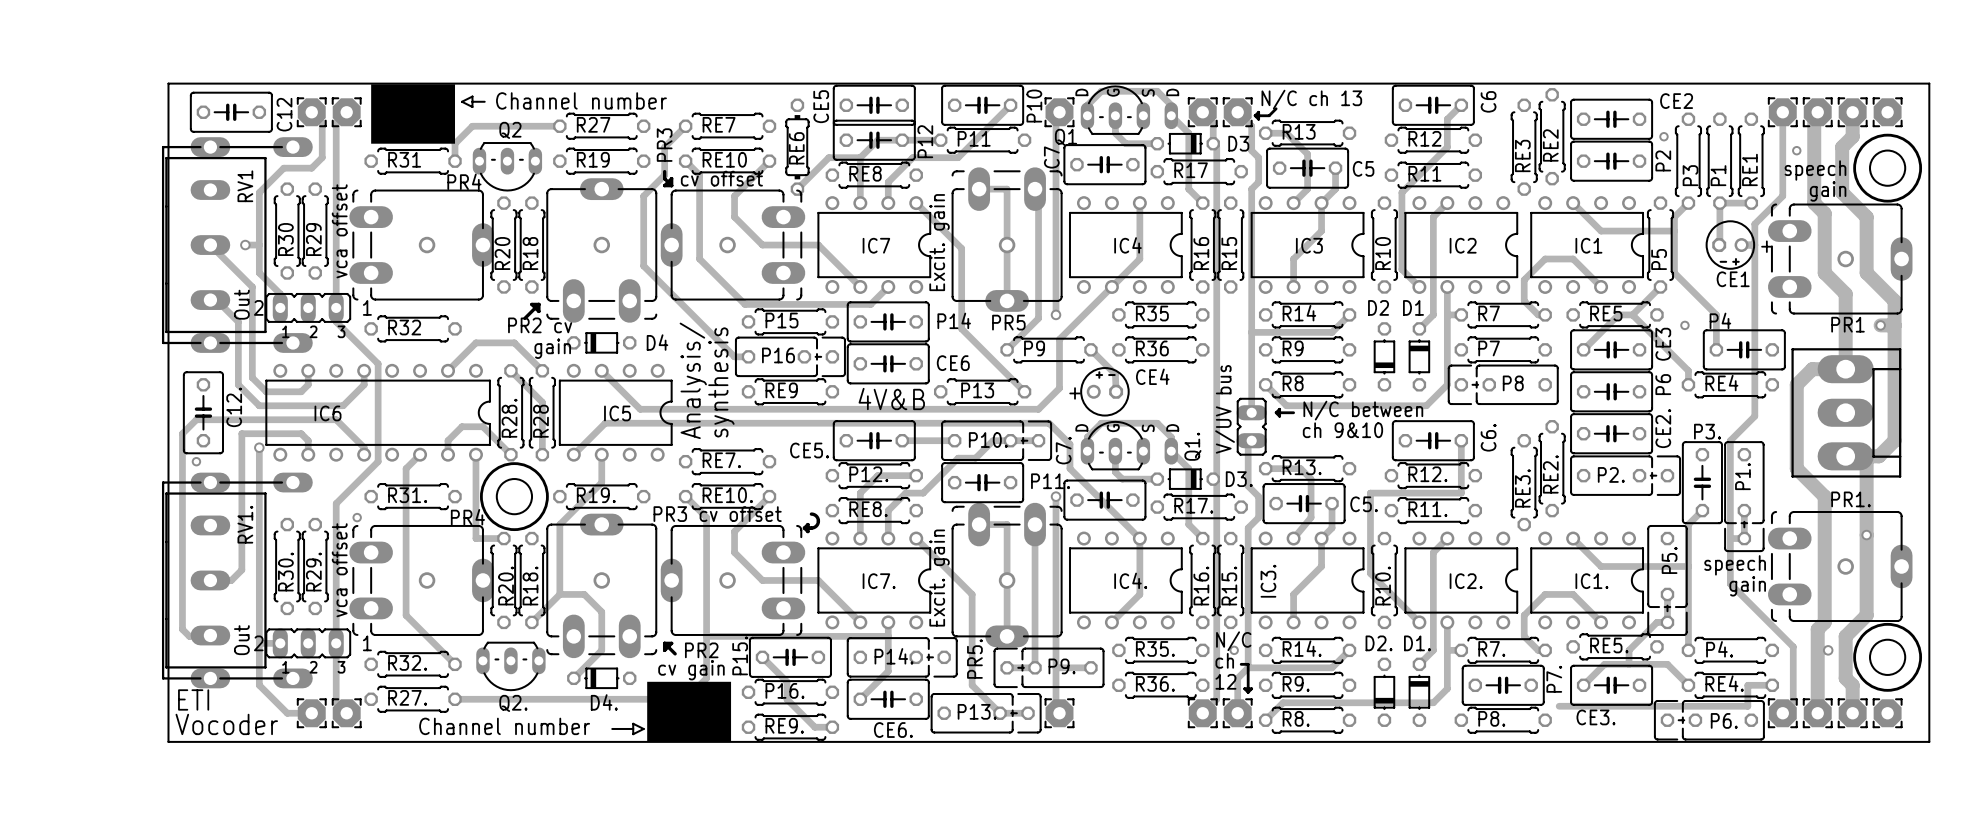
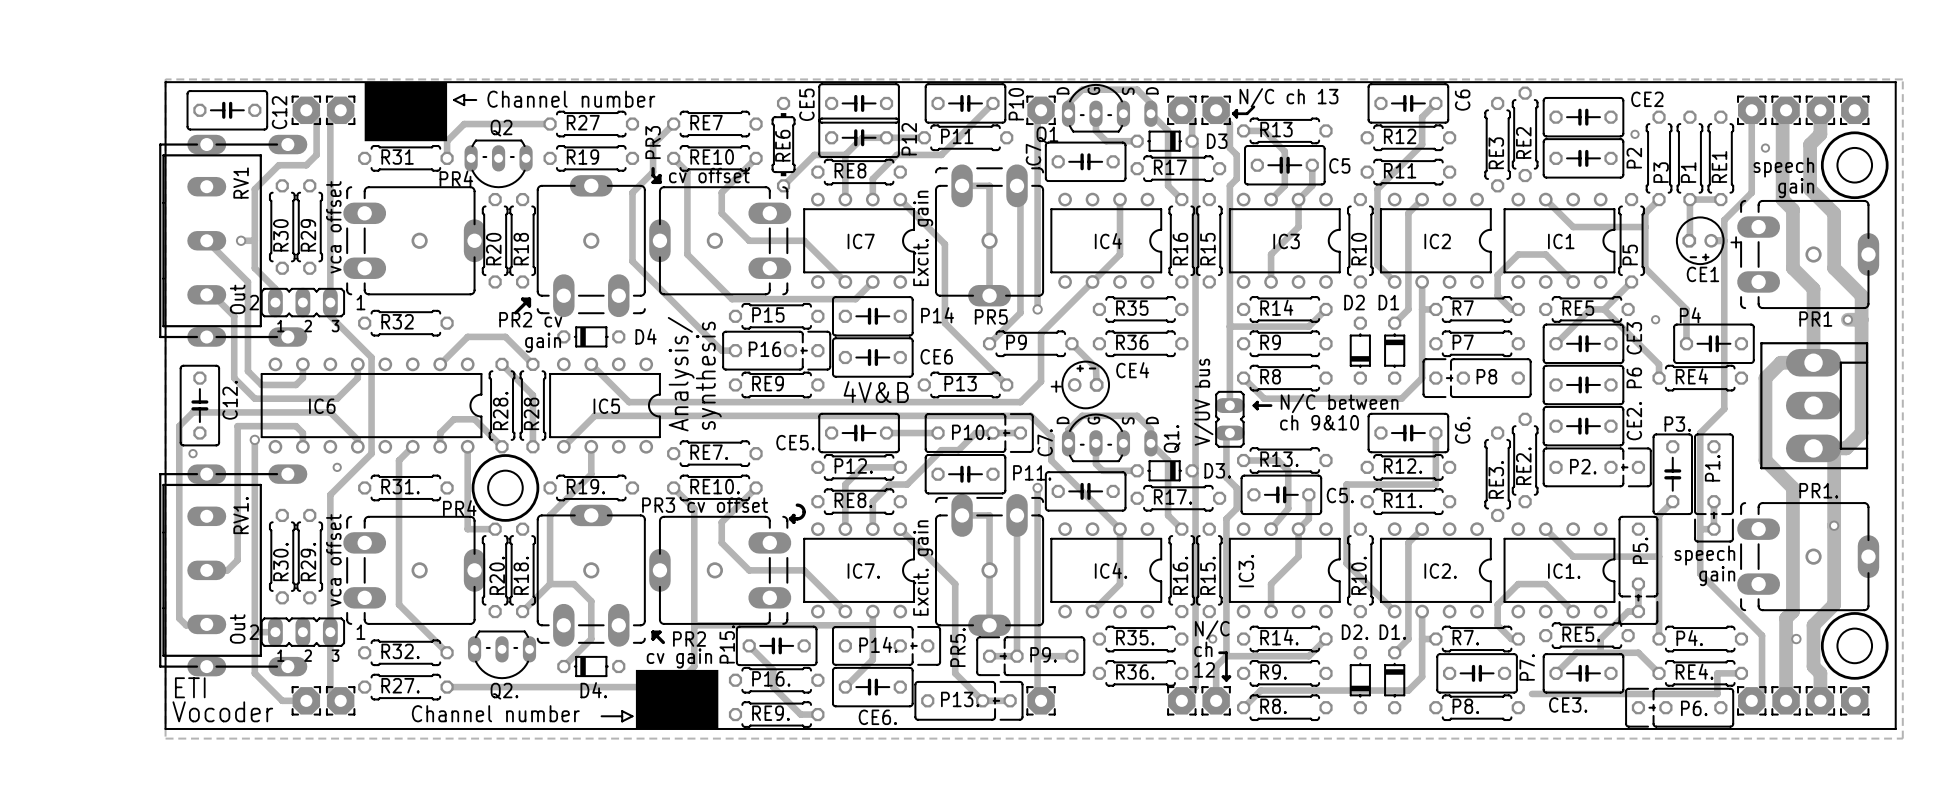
zone outline: none -> (165, 79) (165, 738) (1902, 738) (1902, 79) (165, 79)
via position: (357, 517) -> (337, 467)

